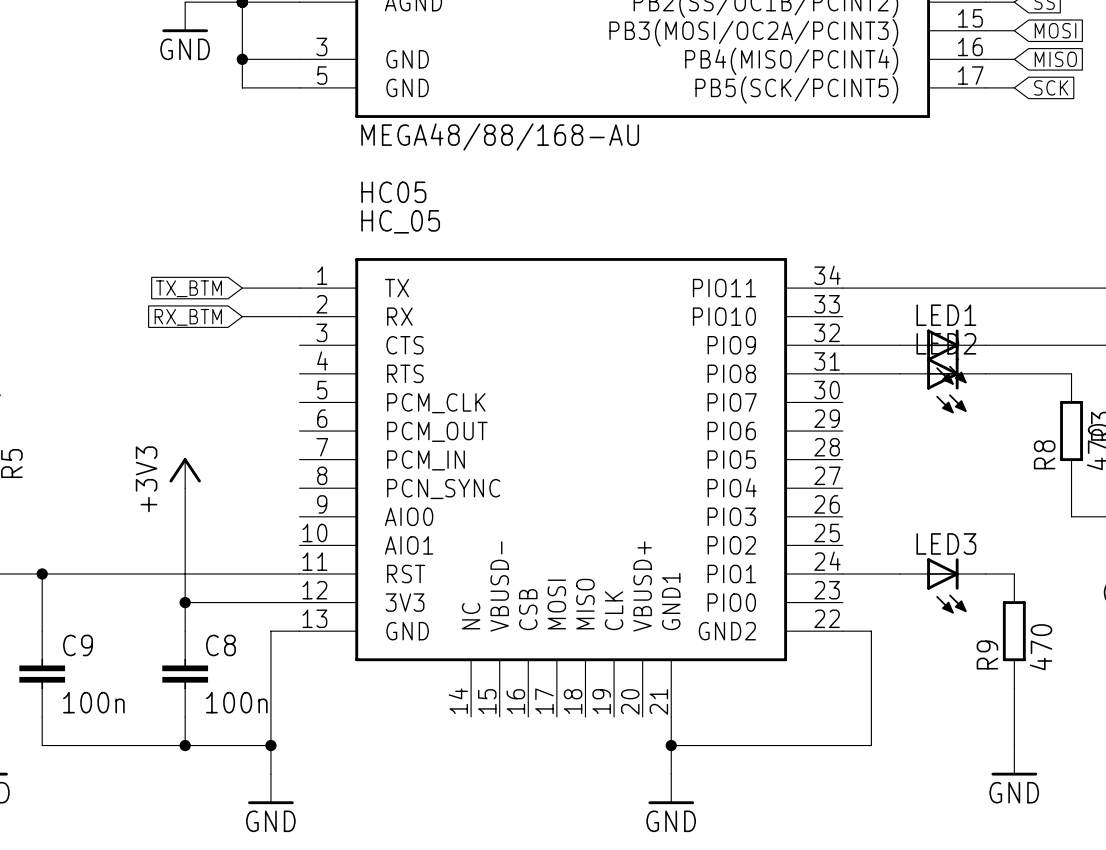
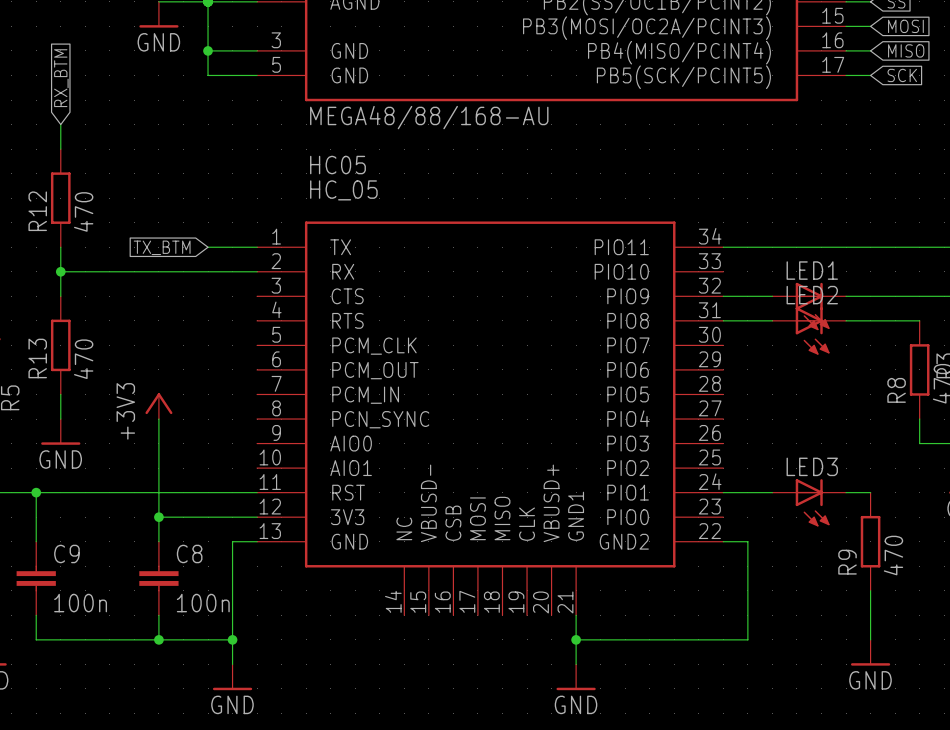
wire: none -> (60, 124) (60, 149)
R12: none -> 470 (60, 198)
wire: none -> (60, 247) (60, 296)
wire: none -> (60, 271) (208, 271)
junction: none -> (60, 271)
global label rotation: 0° (188, 317) -> 90° clockwise (61, 78)
global label position: RX_BTM (188, 317) -> RX_BTM (61, 78)
R13: none -> 470 (60, 345)
wire: none -> (60, 394) (60, 419)
power symbol: none -> GND (60, 431)

